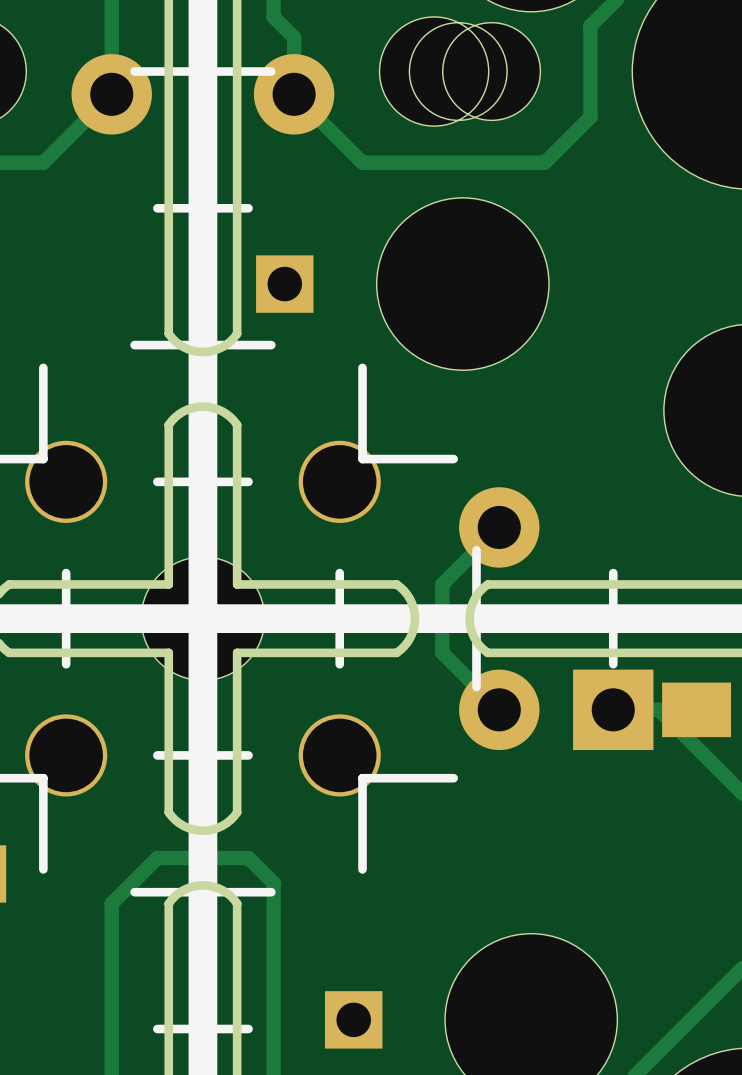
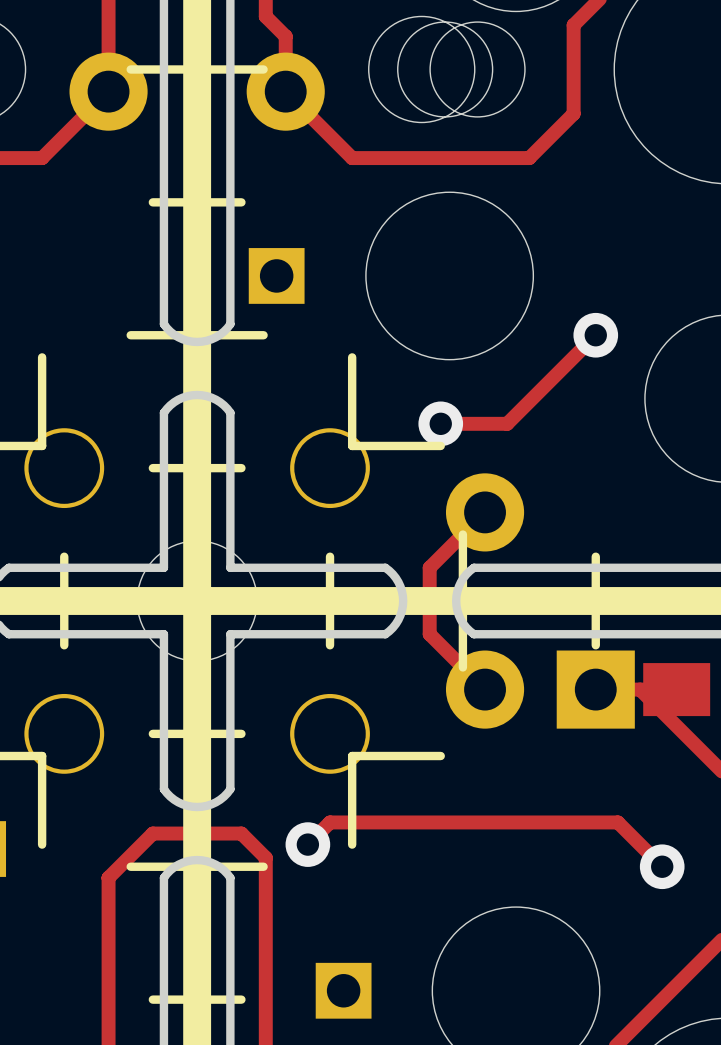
track: none -> (595, 335) (507, 423) (440, 423)
via: none -> (595, 335)
via: none -> (440, 423)
track: none -> (307, 844) (330, 822) (617, 822) (662, 866)
via: none -> (307, 844)
via: none -> (662, 866)

